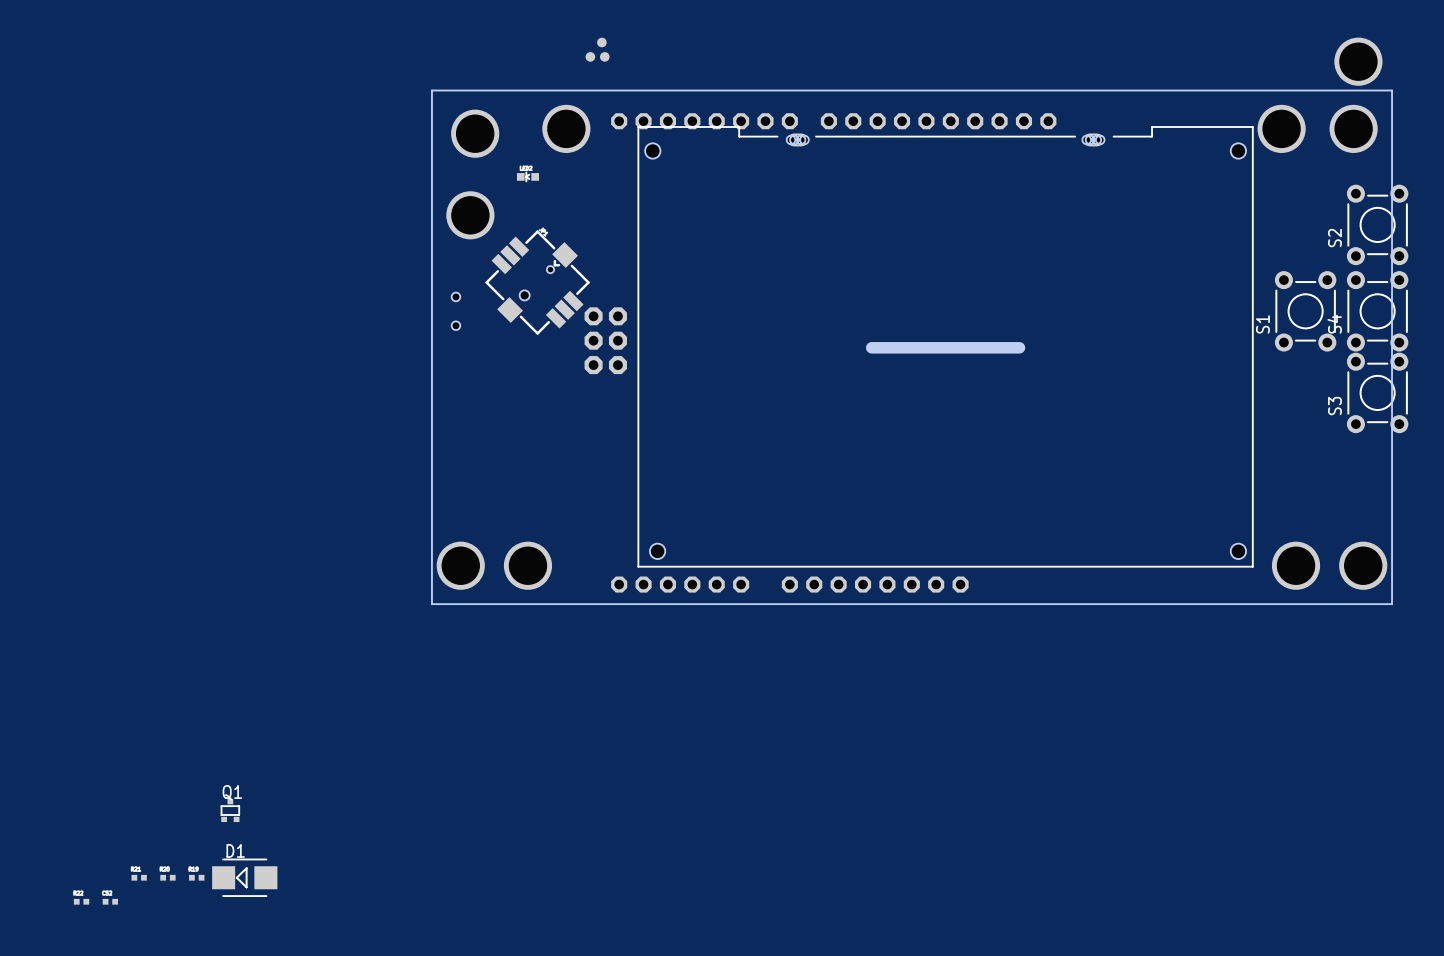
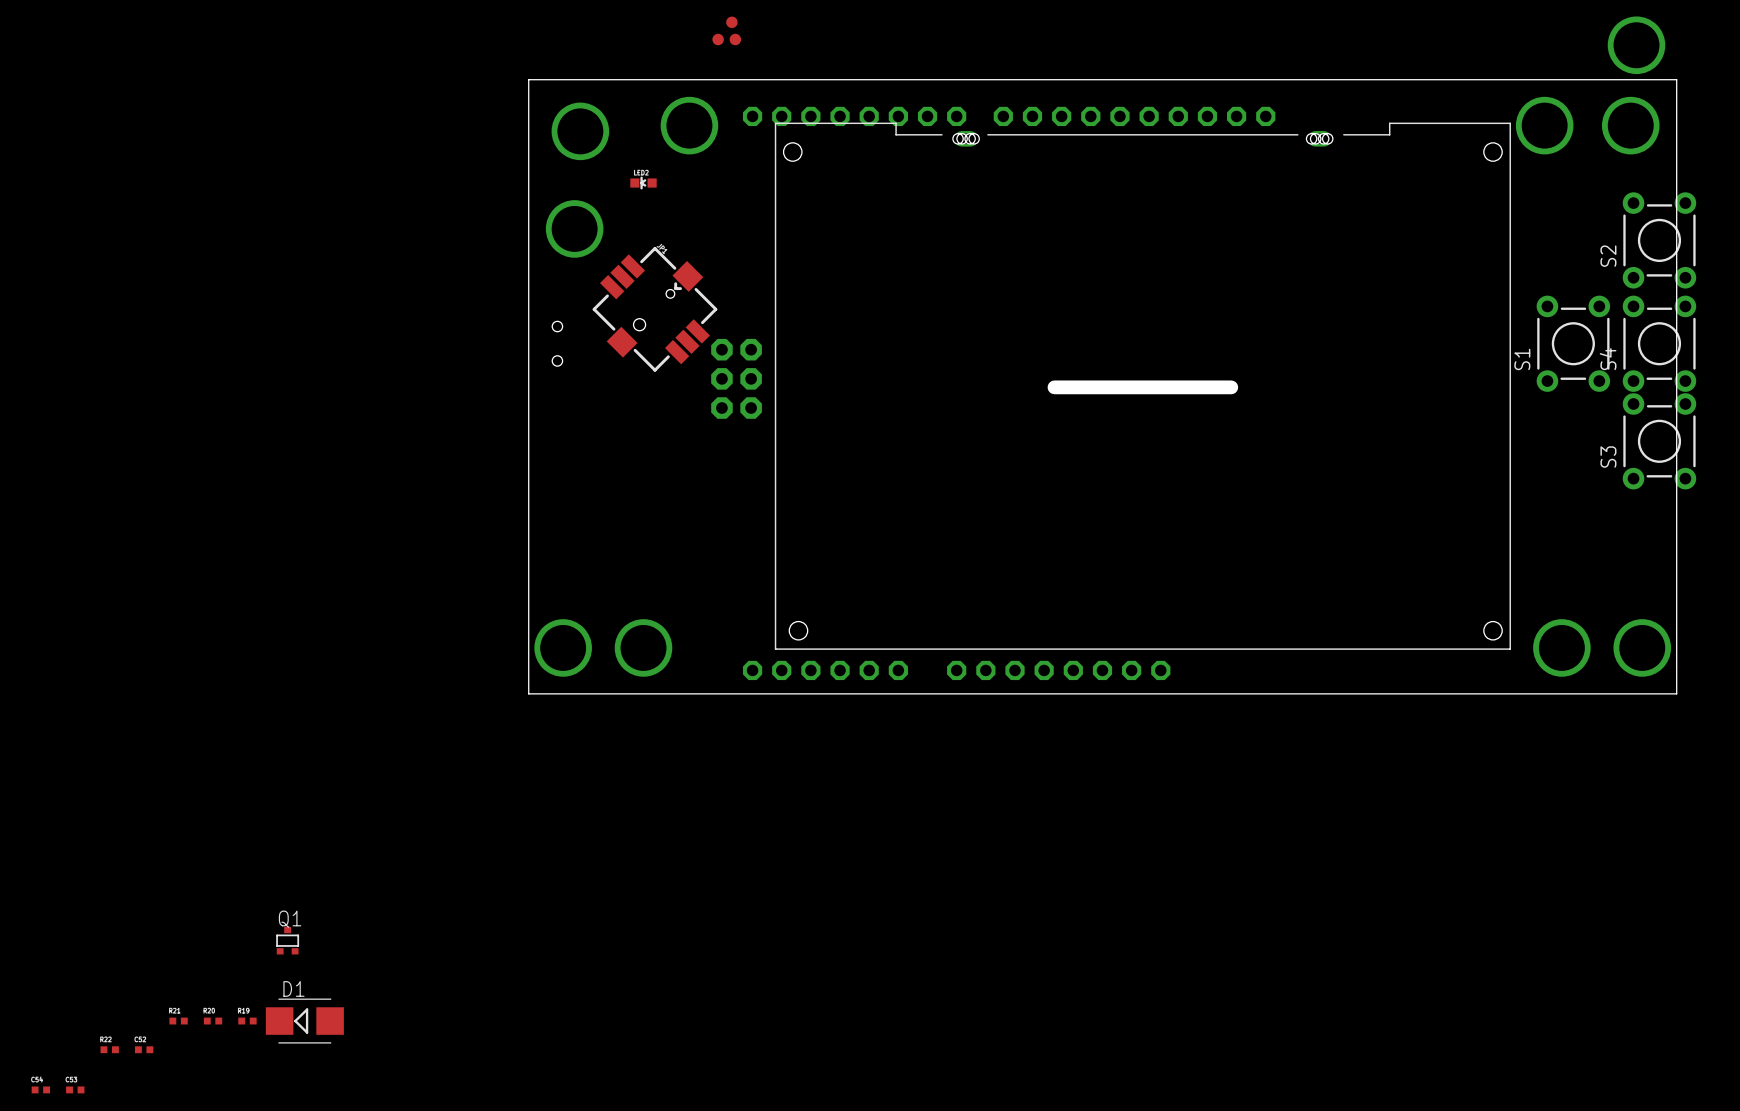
part: none -> (40, 1089)
part: none -> (75, 1089)

